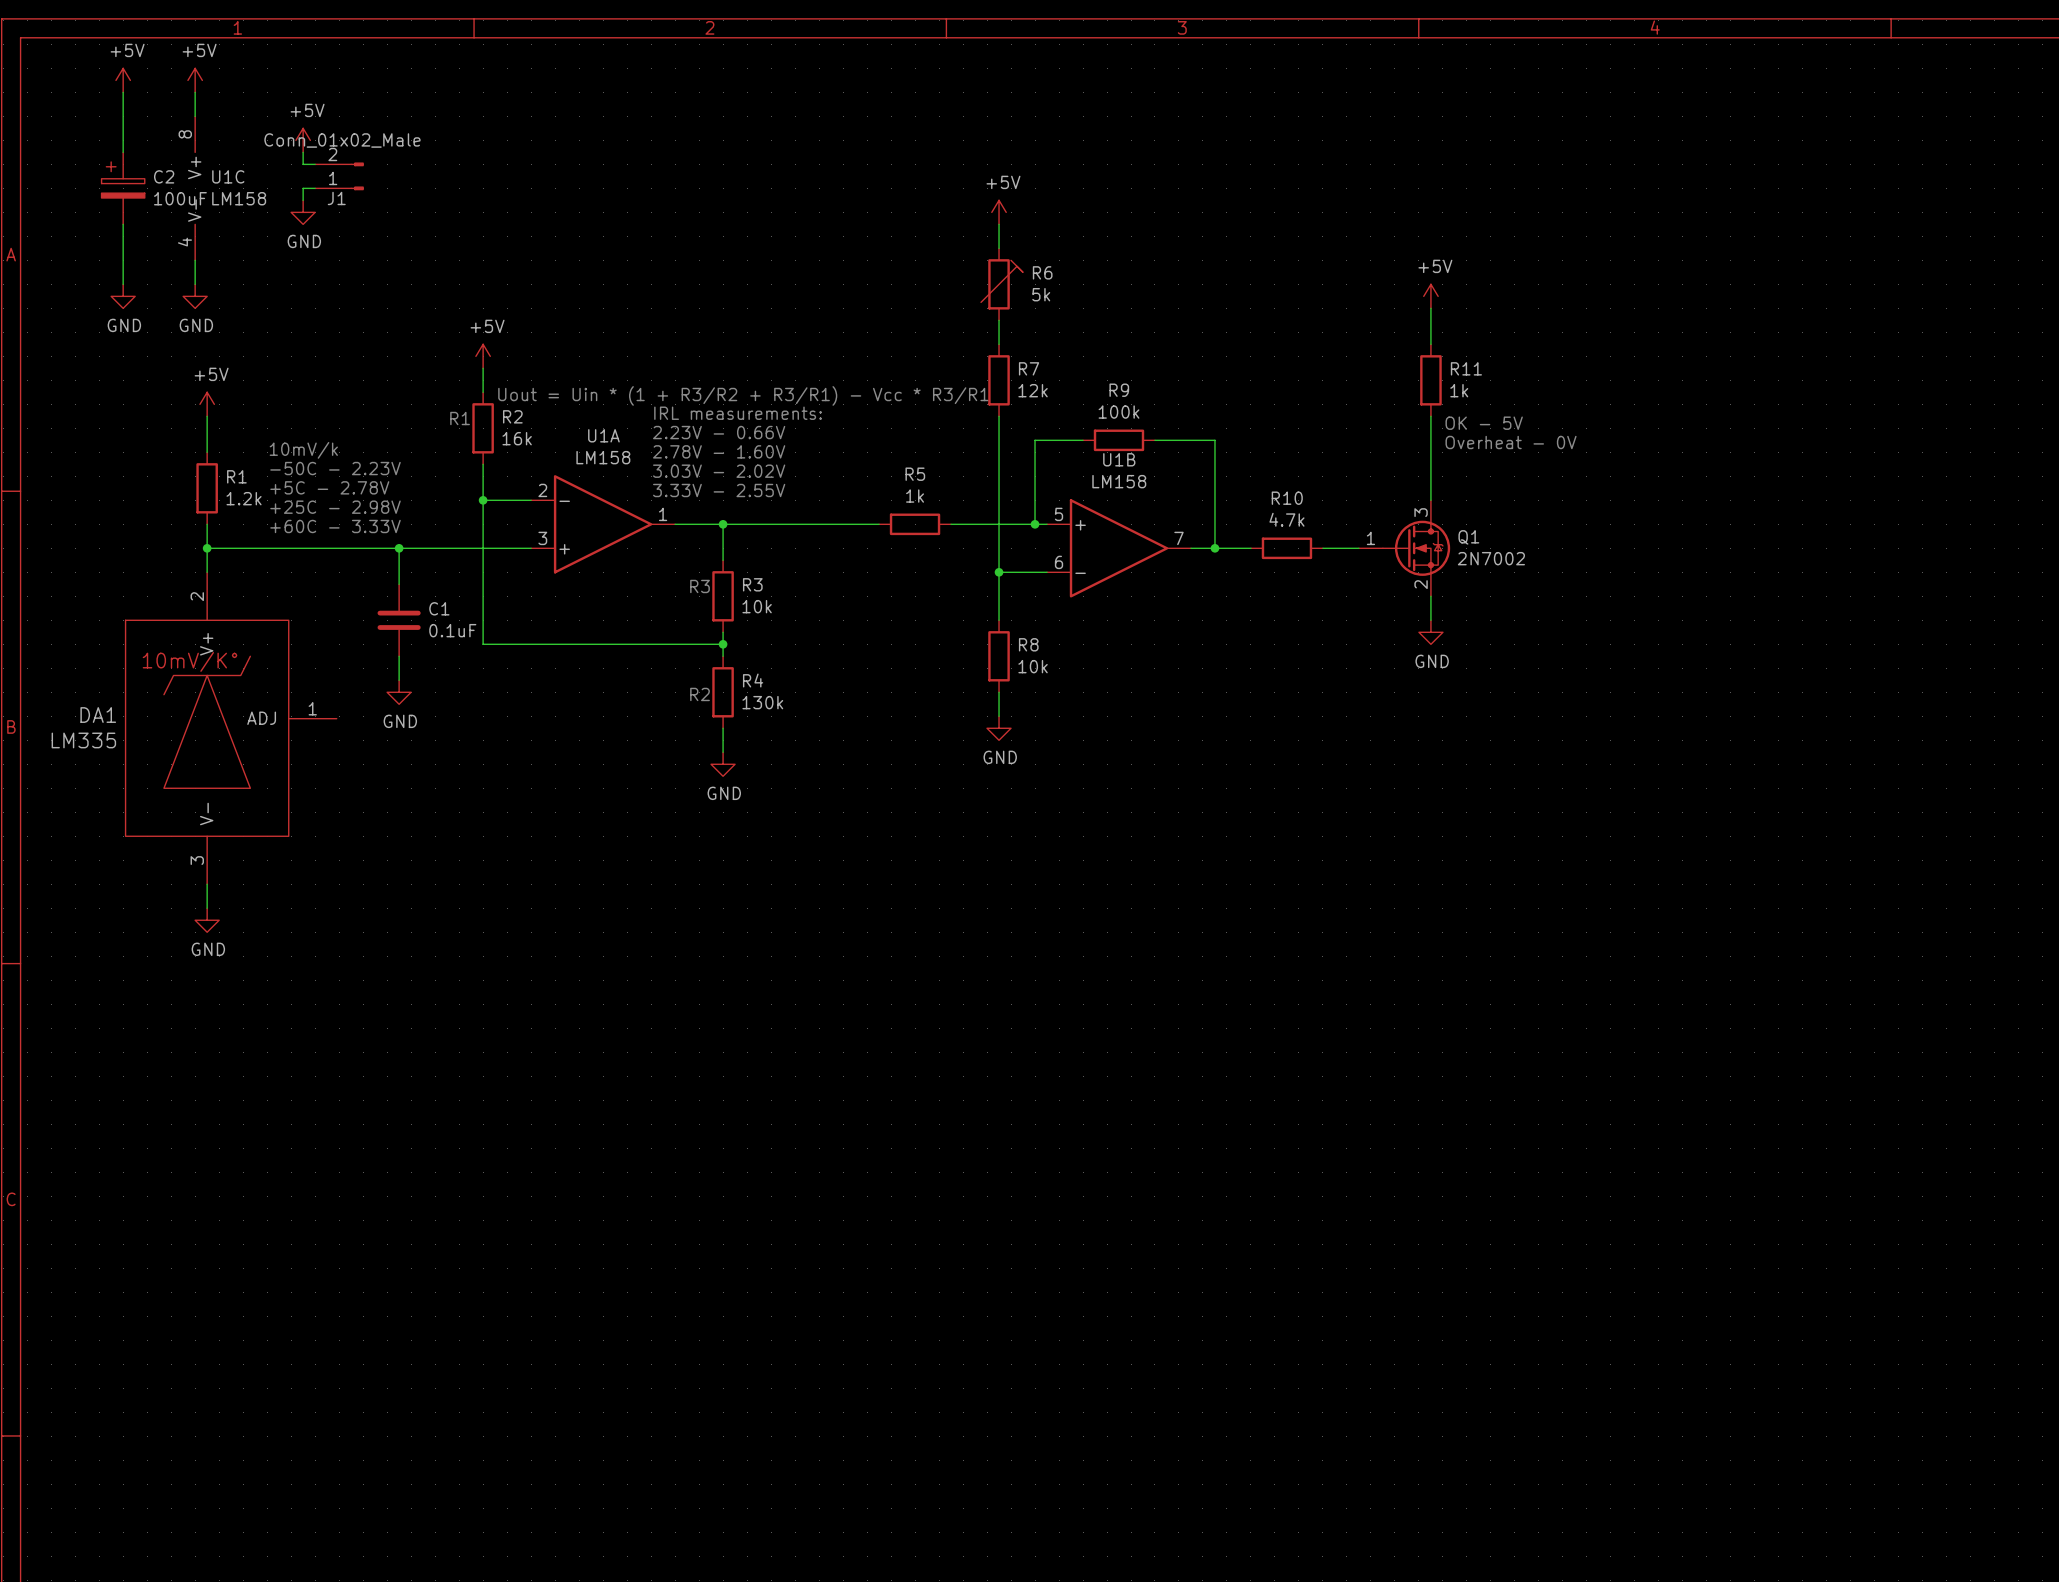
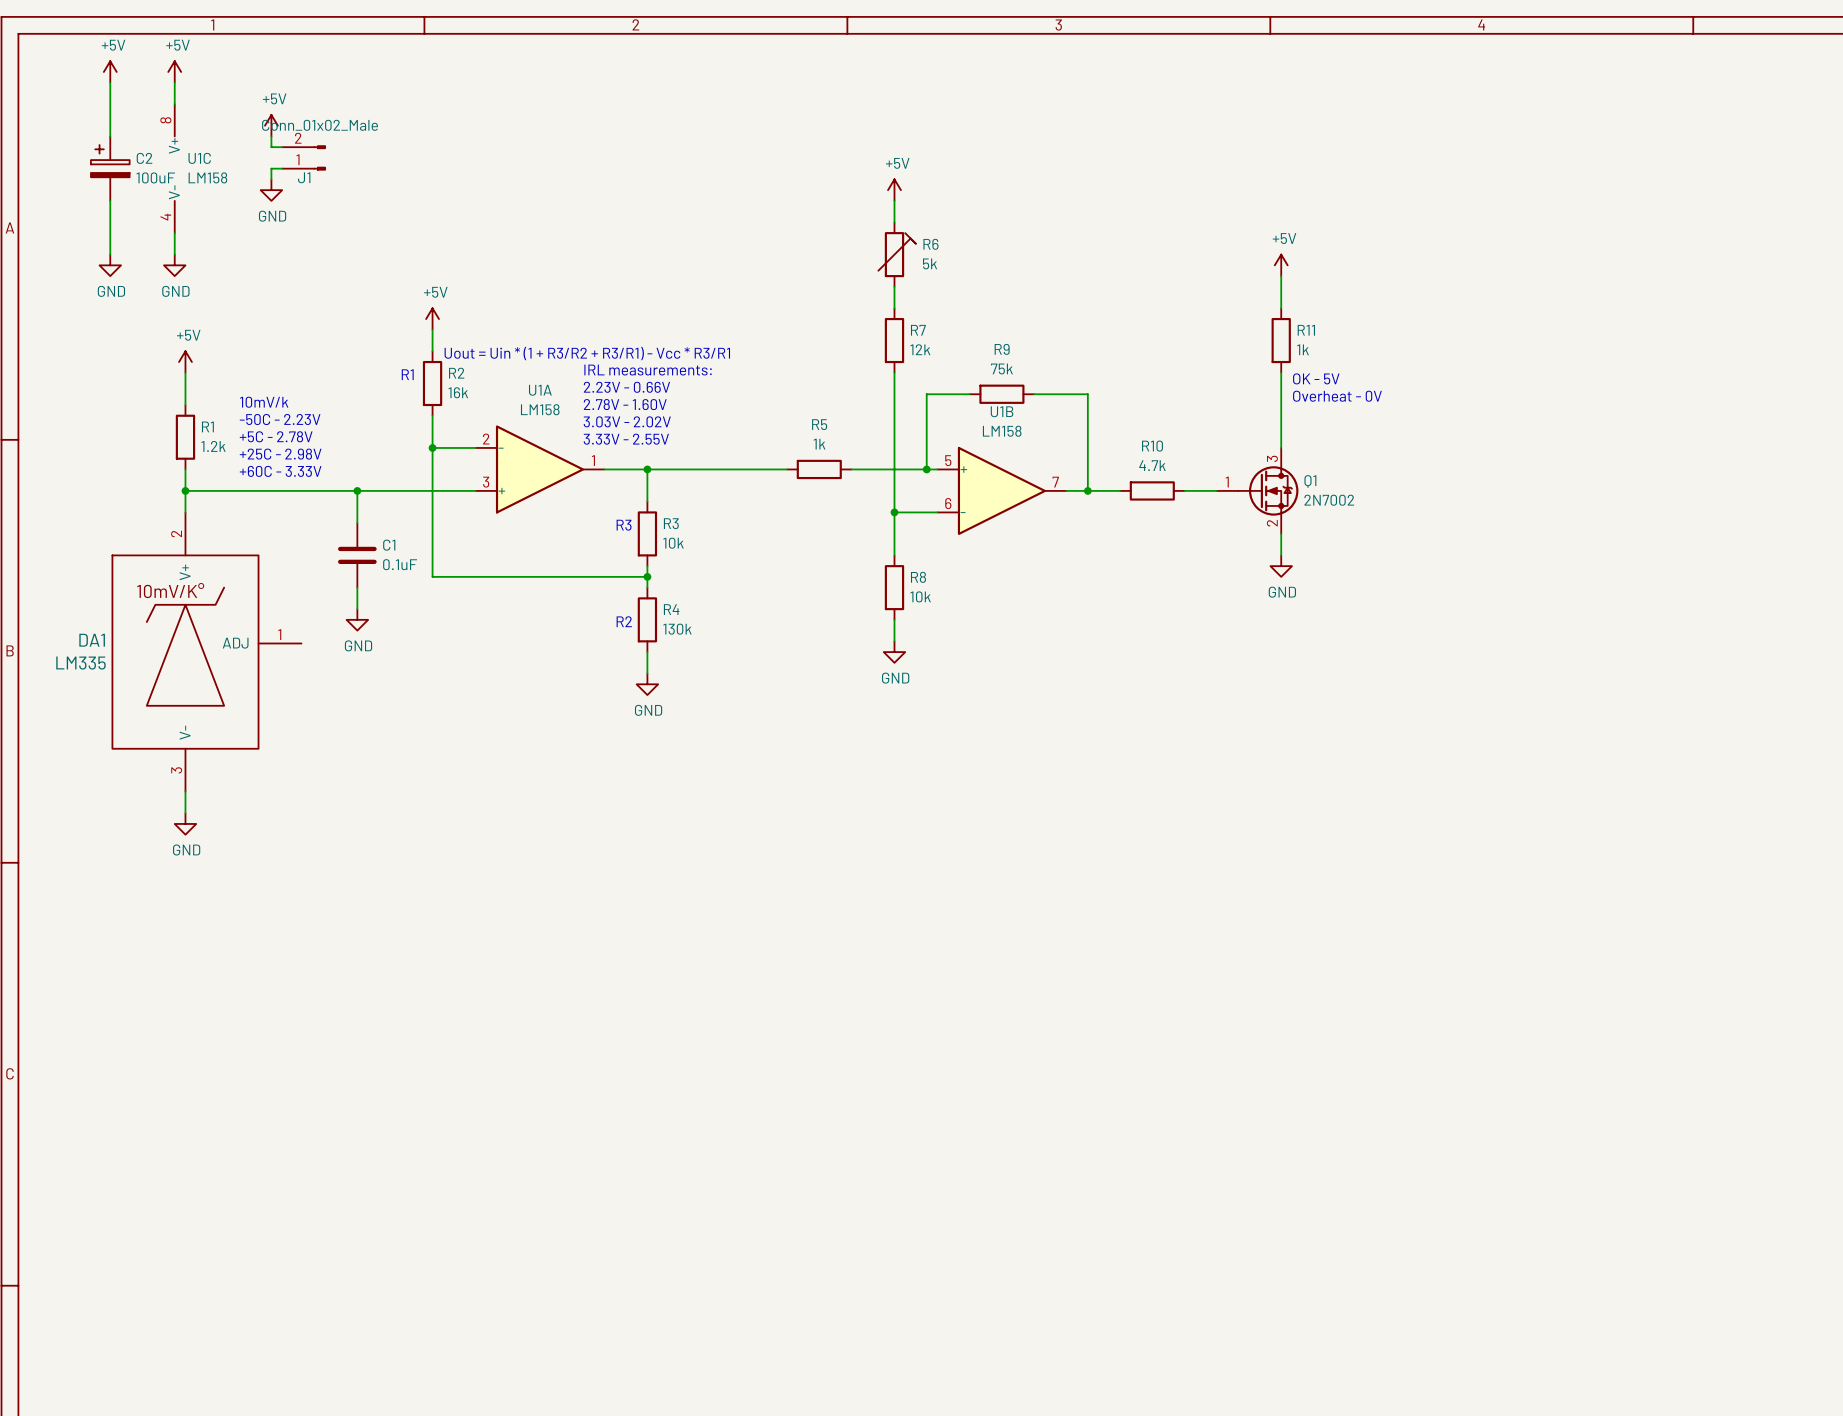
R9 value: 100k (1119, 412) -> 75k (1001, 368)

